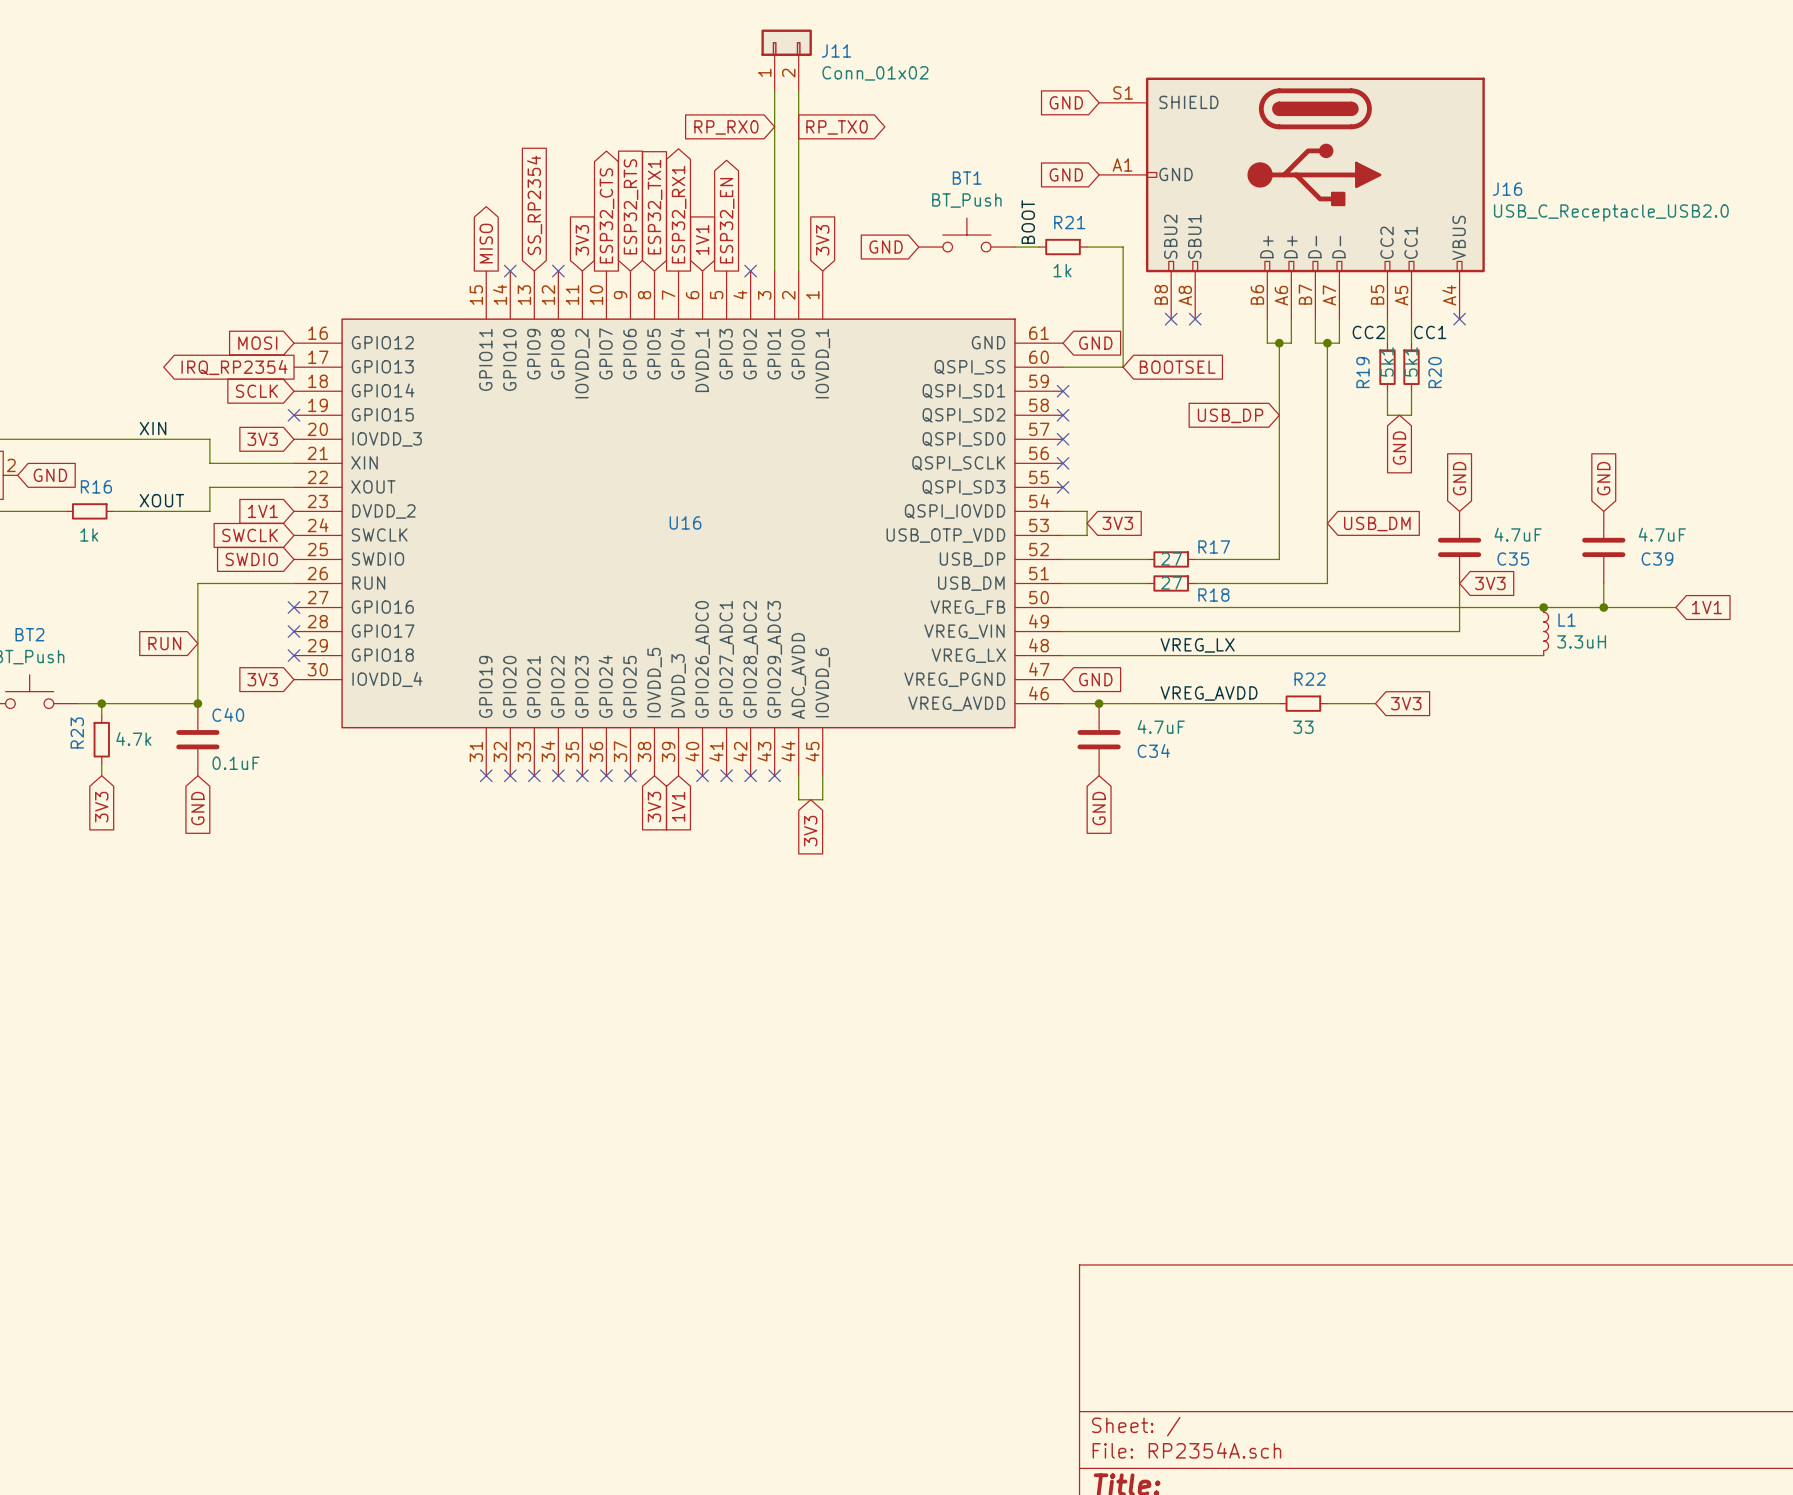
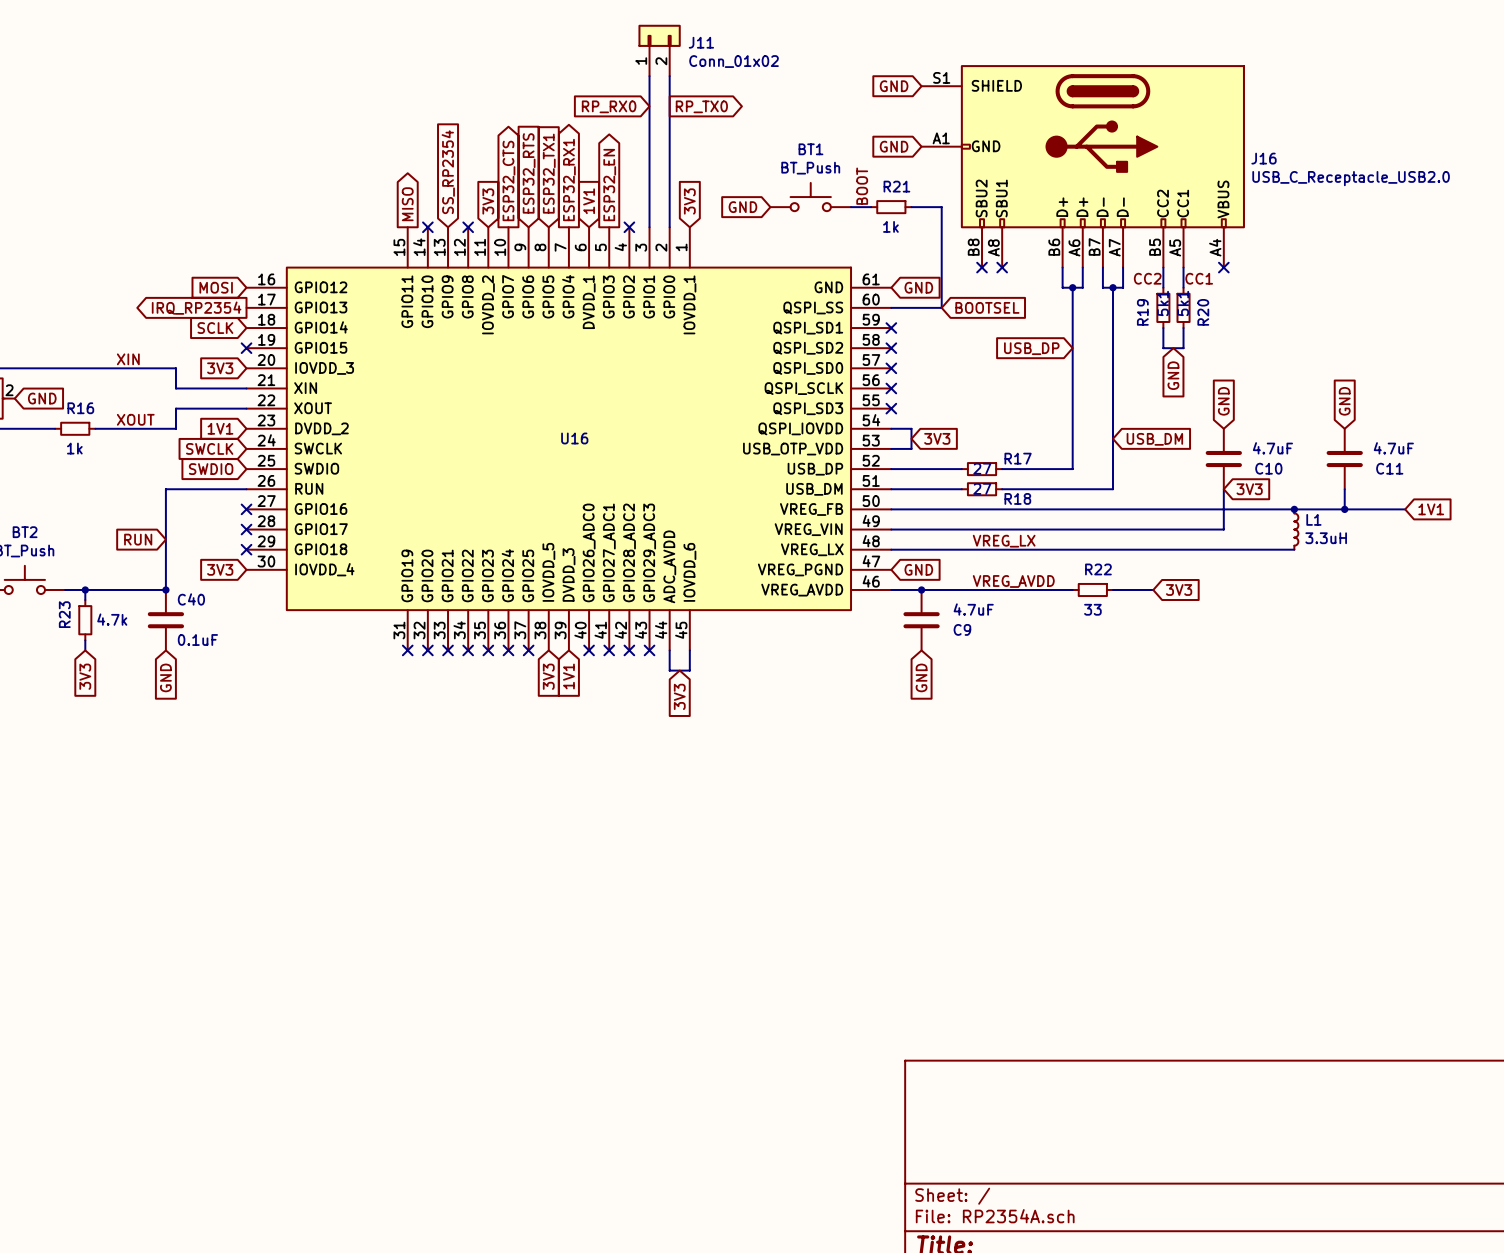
C35 name: C35 (1513, 559) -> C10 (1268, 468)
C39 name: C39 (1657, 559) -> C11 (1389, 468)
C34 name: C34 (1153, 750) -> C9 (962, 629)

